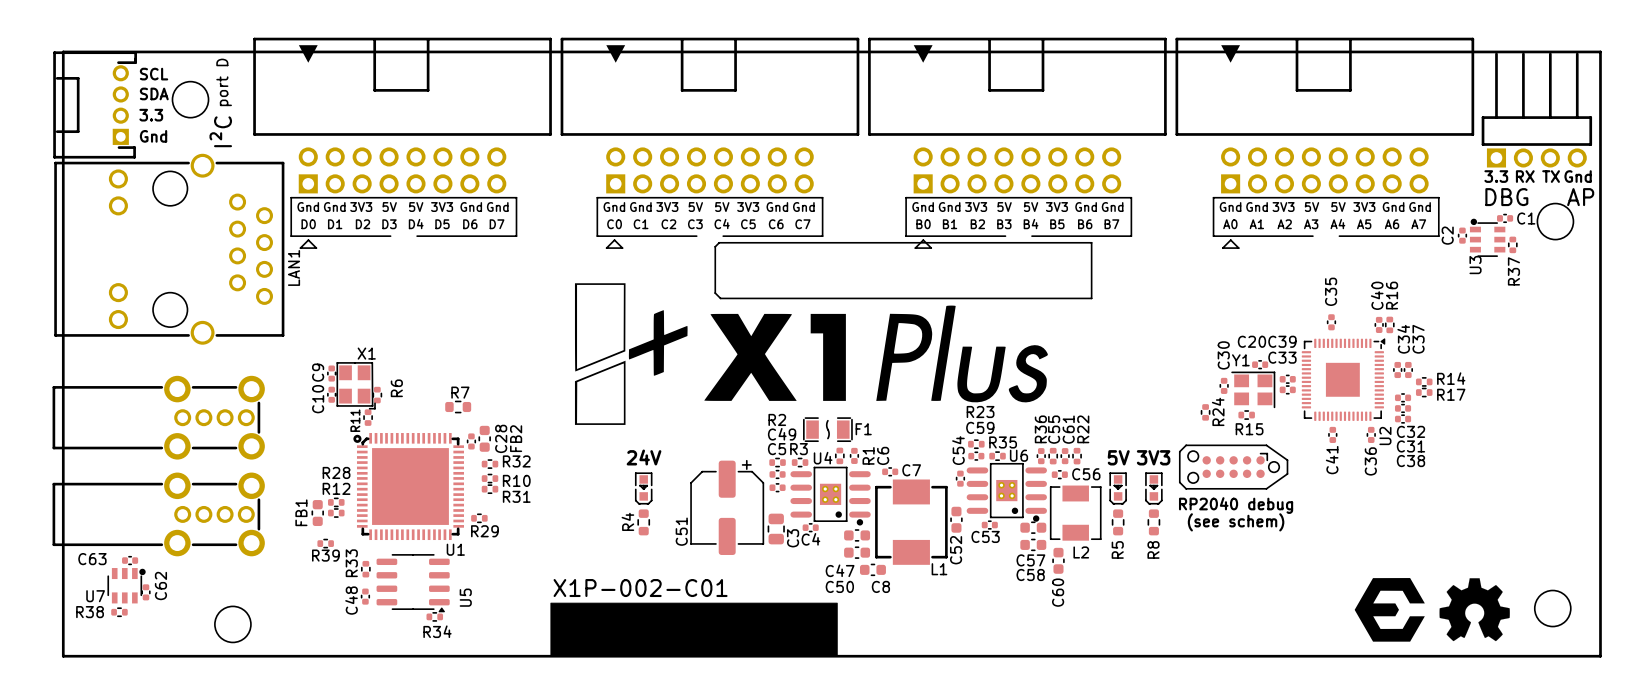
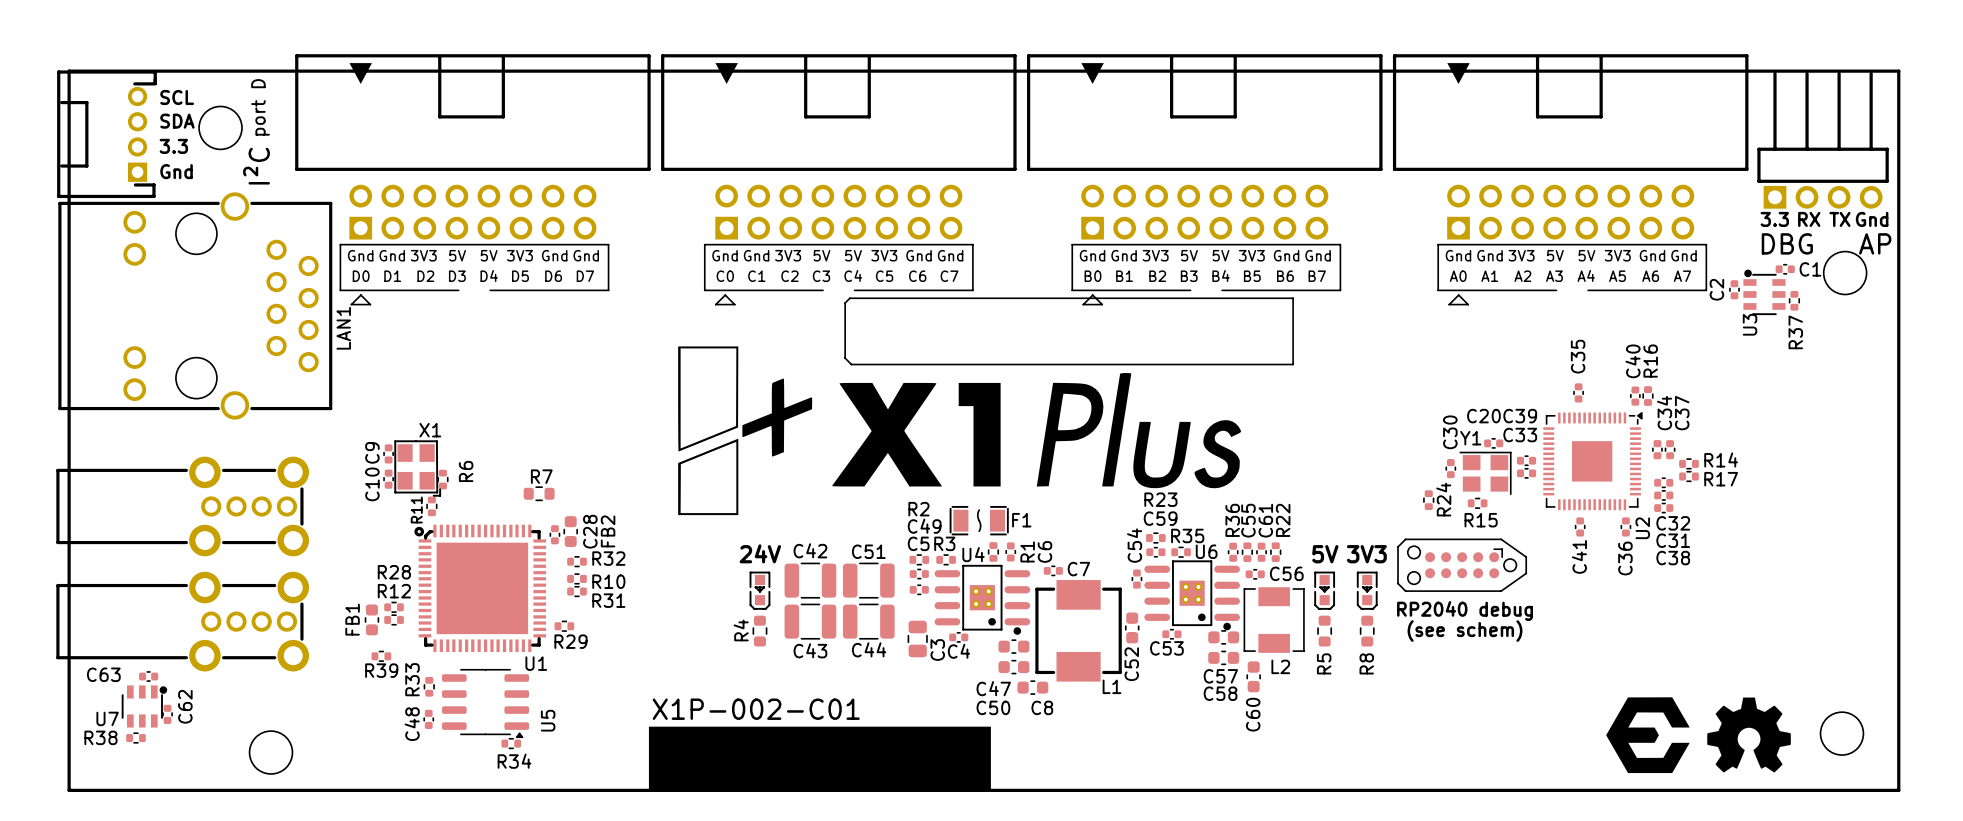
C51 footprint: [690, 460, 764, 555] -> [842, 562, 895, 599]
C42: none -> (810, 580)
C43: none -> (810, 621)
C44: none -> (868, 621)
C51 name position: C51 (681, 531) -> C51 (868, 551)

